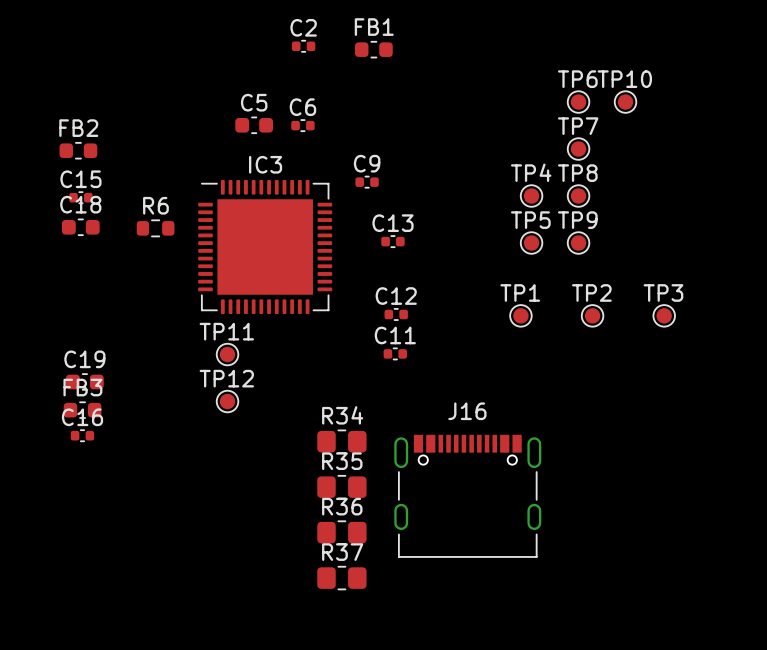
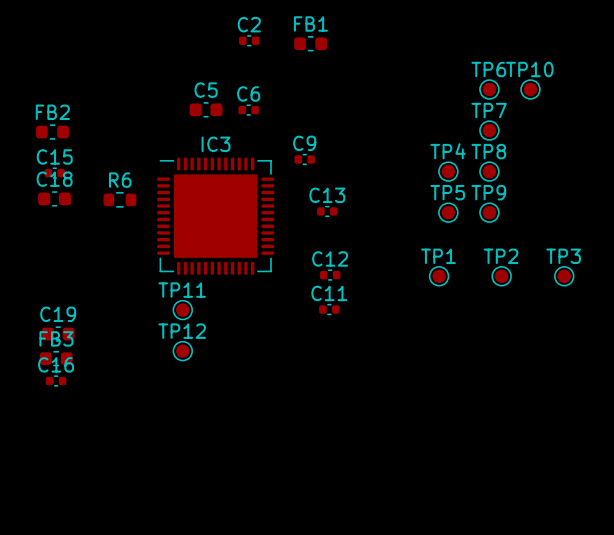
R34: (341, 441) -> none
R35: (341, 487) -> none
J16: (467, 496) -> none
R36: (341, 532) -> none
R37: (341, 578) -> none

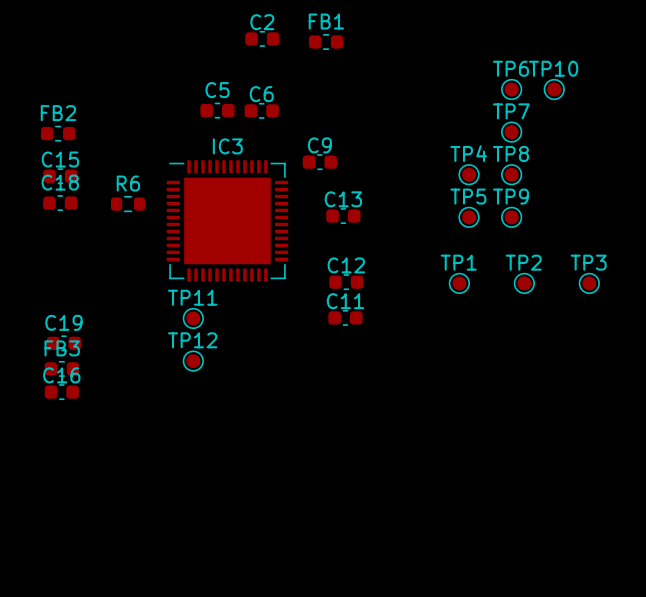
C2 footprint: [239, 35, 260, 47] -> [245, 30, 280, 47]
C6 footprint: [238, 104, 259, 116] -> [244, 102, 279, 119]
C9 footprint: [294, 153, 315, 166] -> [302, 154, 338, 171]
C15 footprint: [44, 167, 65, 179] -> [43, 168, 78, 185]
C13 footprint: [317, 205, 338, 218] -> [326, 208, 361, 225]
C12 footprint: [319, 269, 341, 281] -> [329, 274, 364, 291]
C11 footprint: [319, 303, 340, 316] -> [328, 309, 363, 326]
C16 footprint: [45, 375, 67, 387] -> [44, 384, 79, 401]

